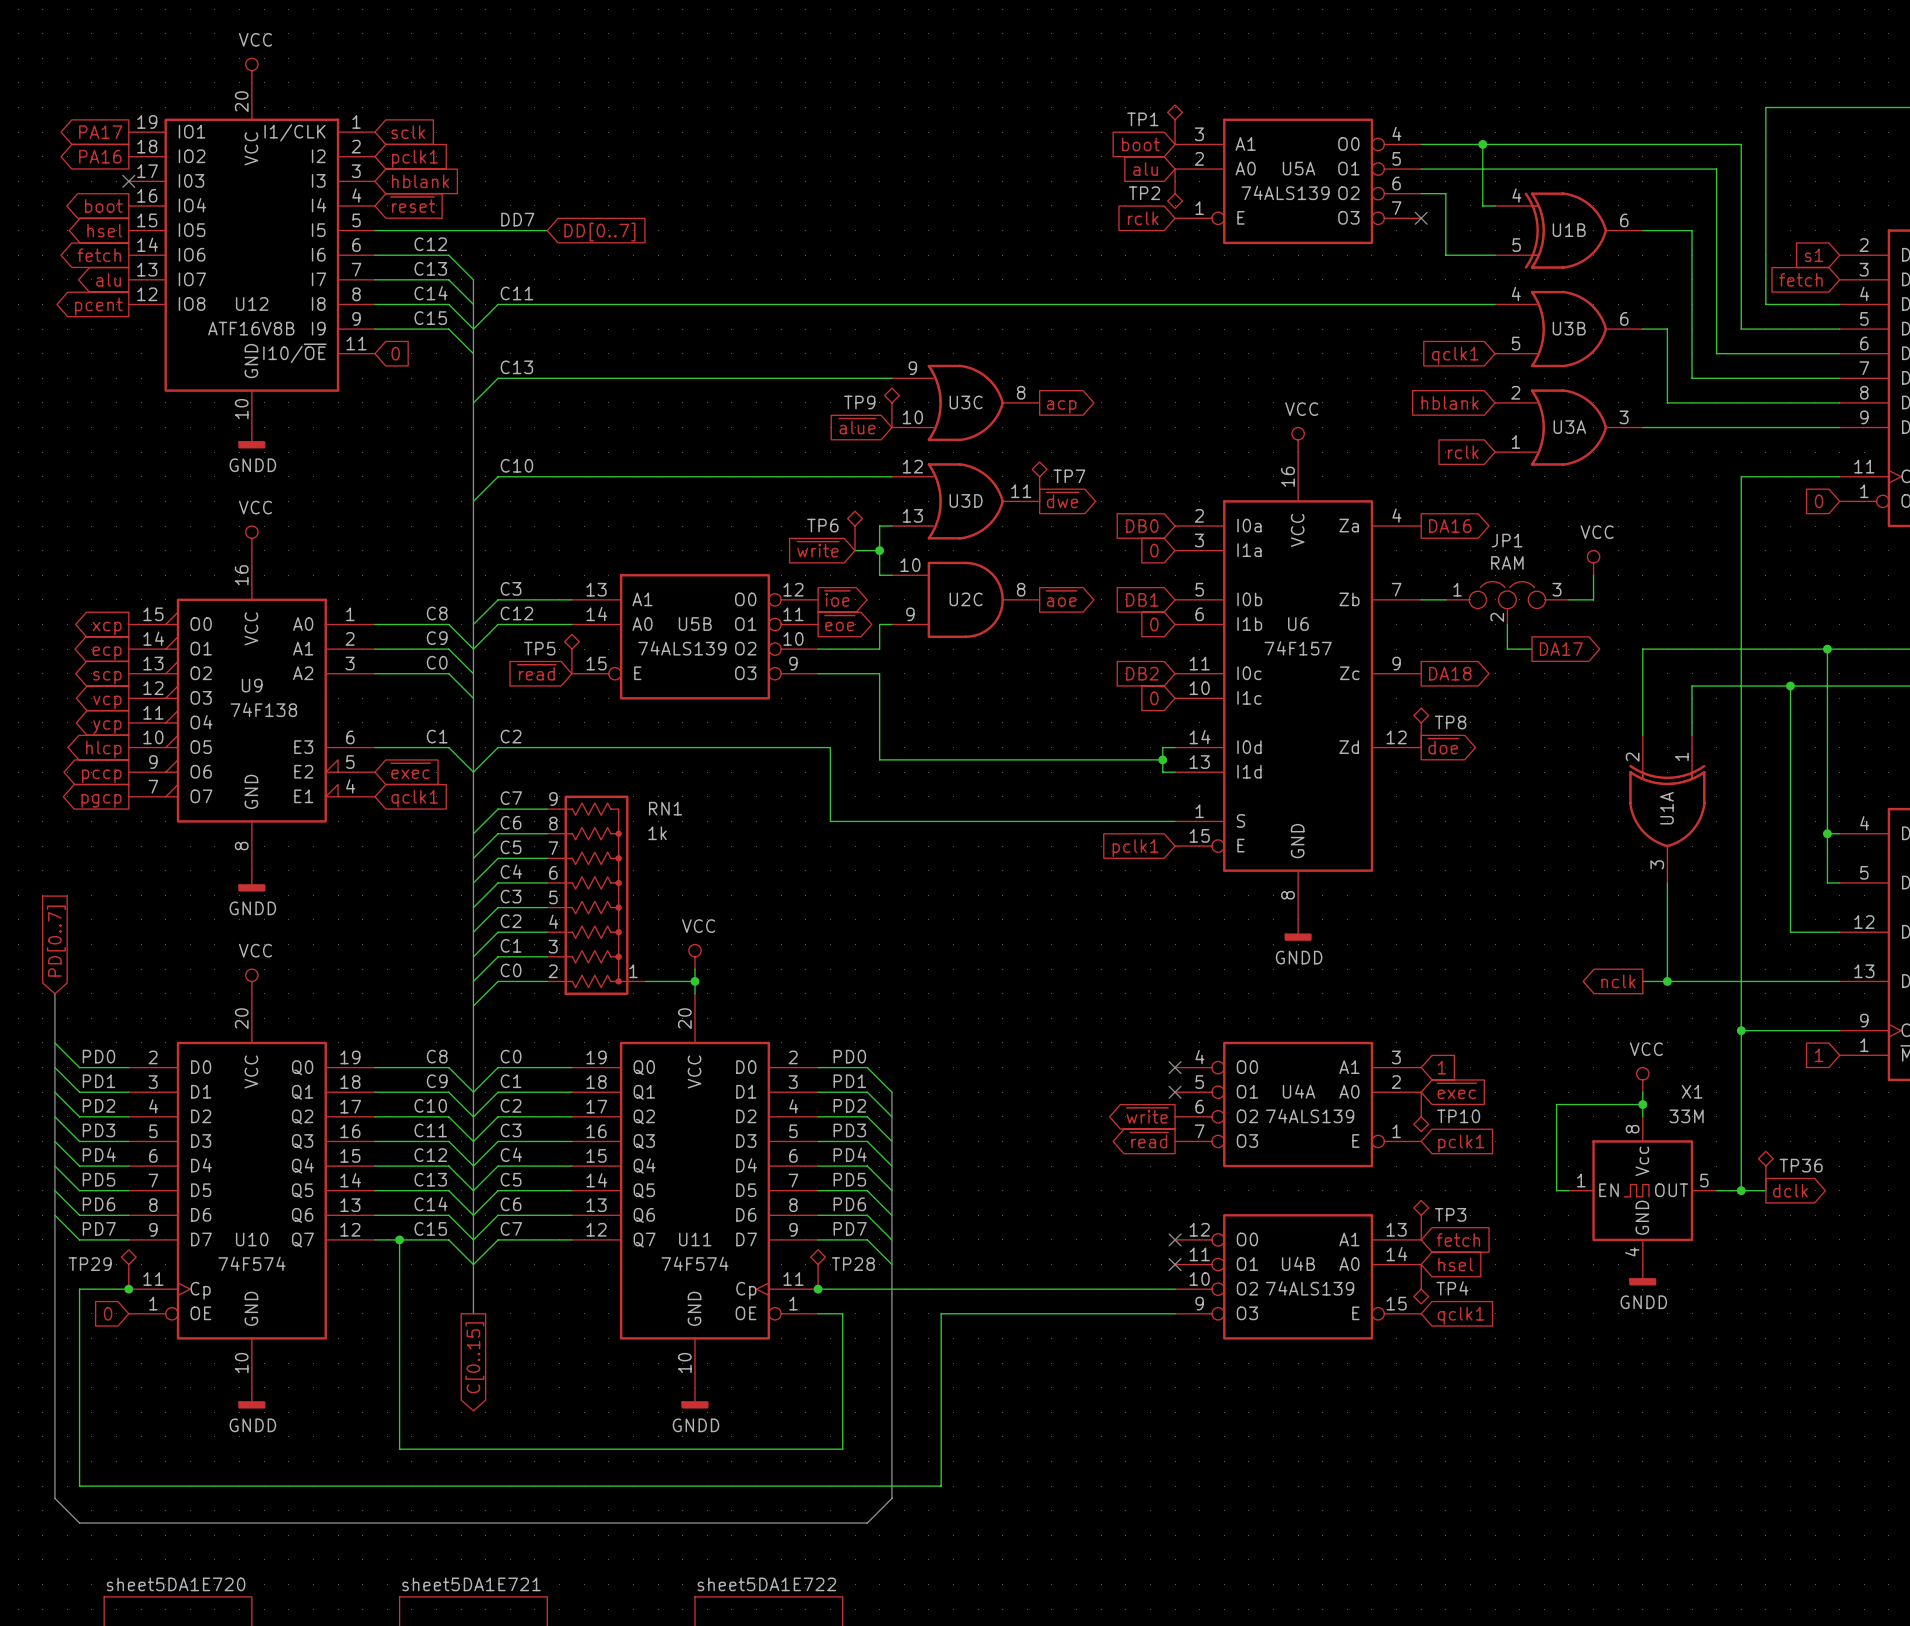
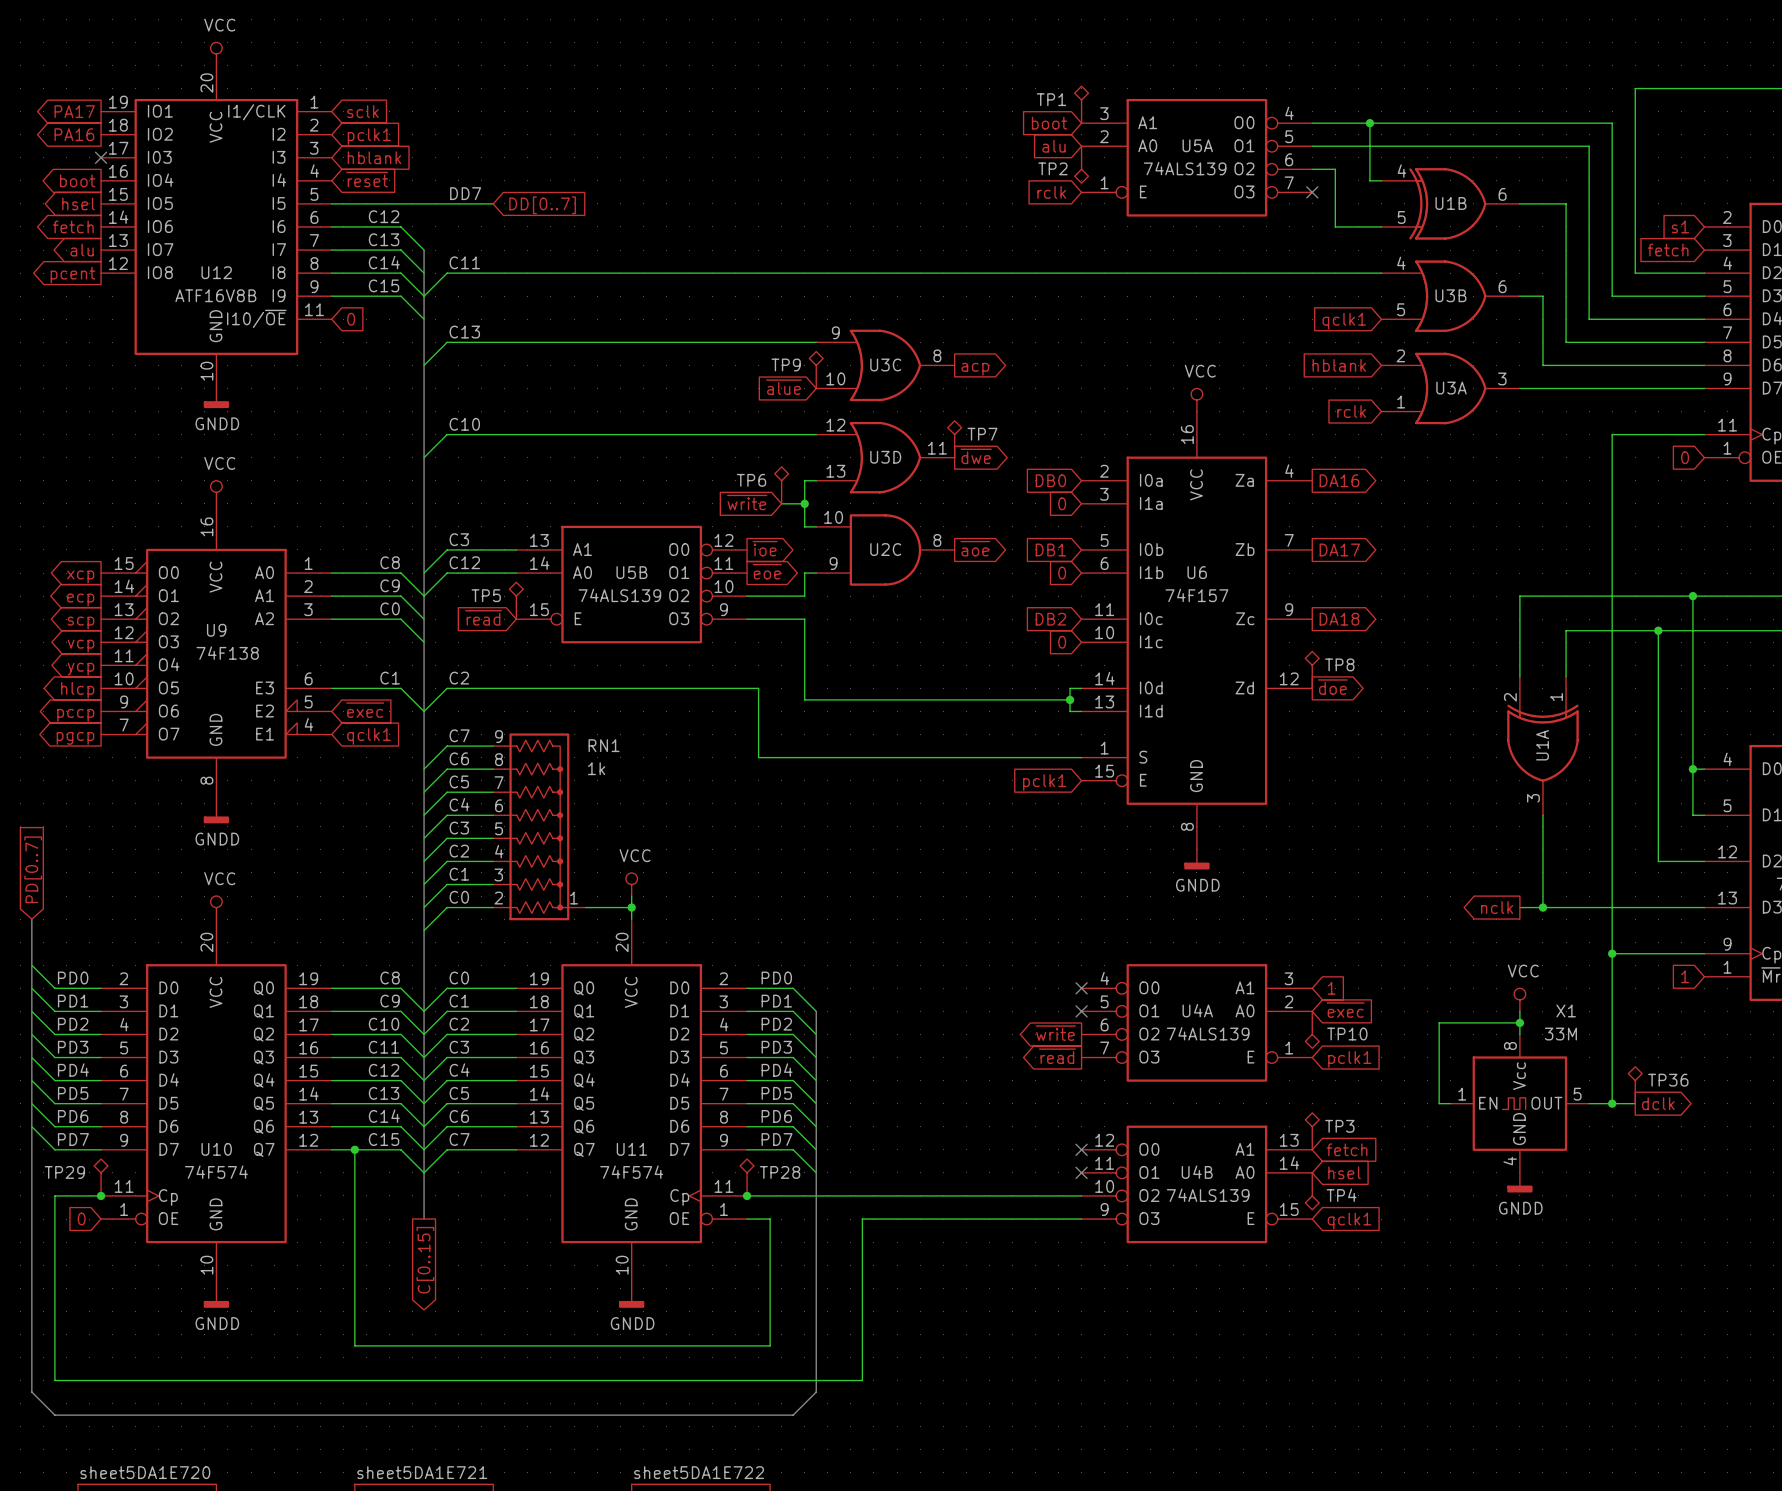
power symbol: VCC (1593, 562) -> none
wire: (1593, 575) (1593, 599) (1568, 599) -> none
wire: (1421, 599) (1445, 599) -> none
JP1: RAM (1507, 603) -> none
wire: (1507, 624) (1507, 649) (1532, 649) -> none
global label position: DA17 (1561, 649) -> DA17 (1339, 549)

